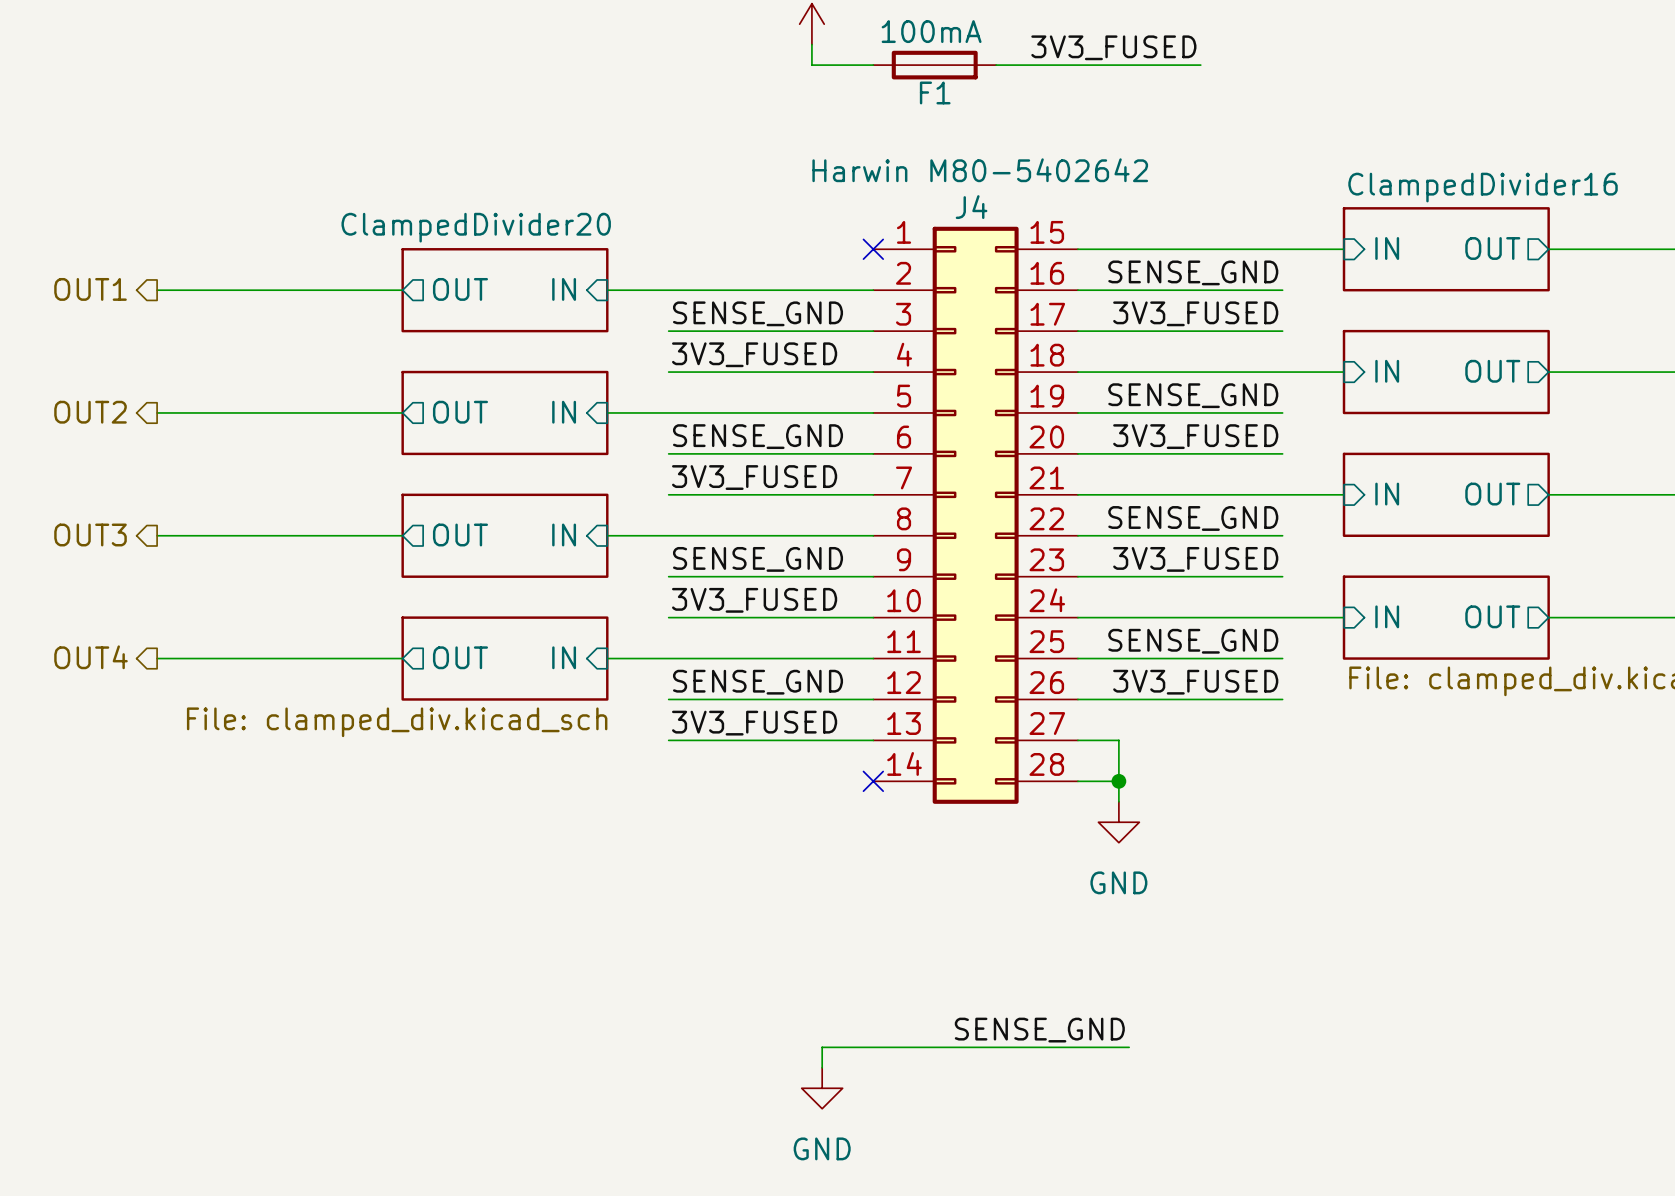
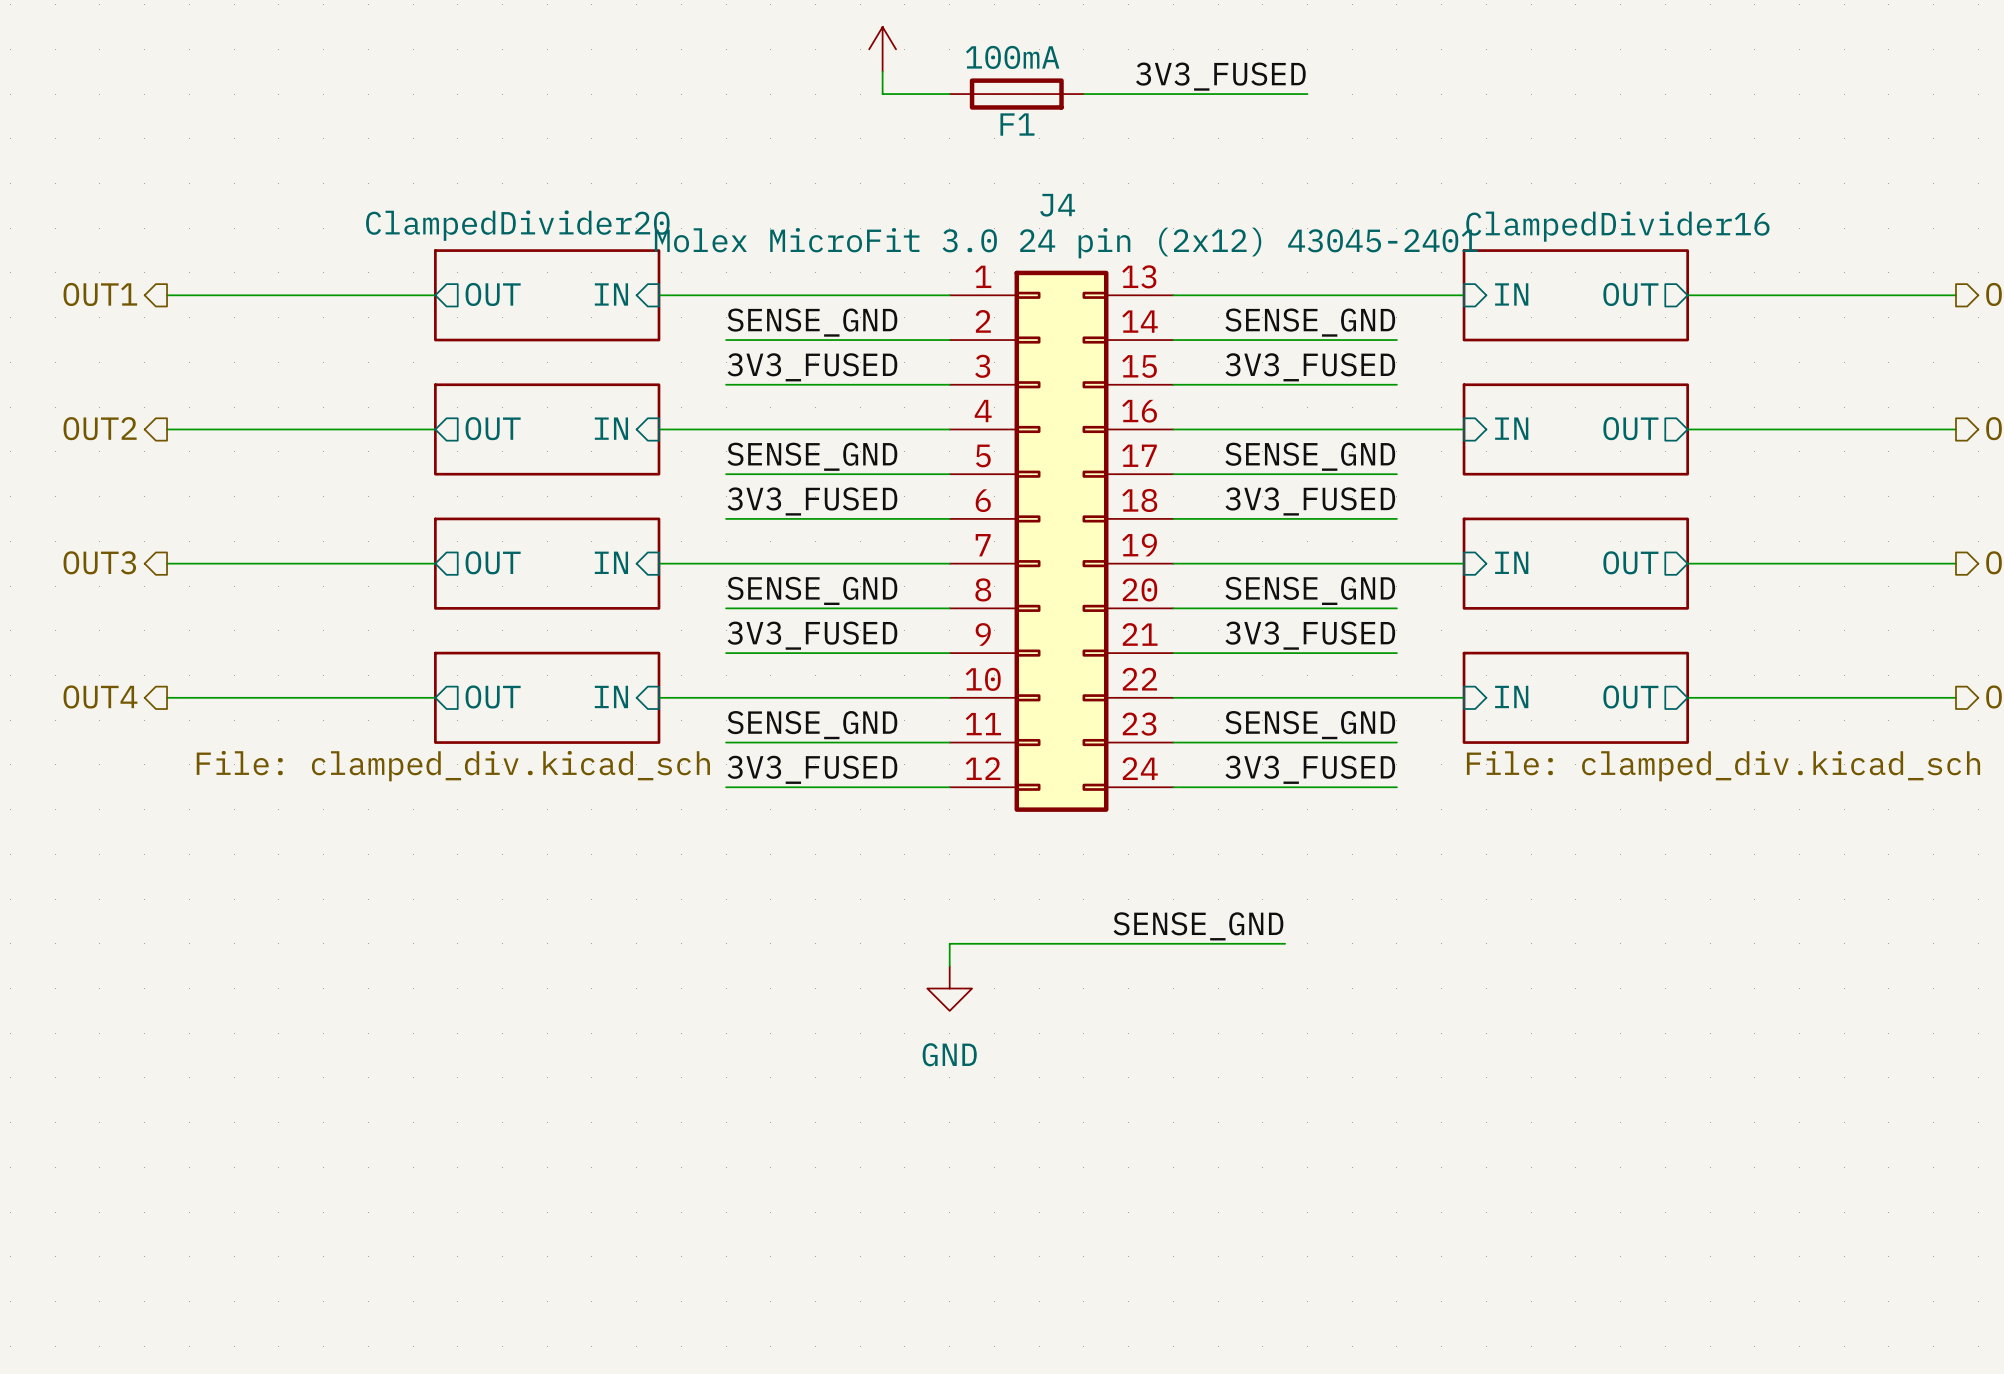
J4 value: Harwin M80-5402642 (980, 170) -> Molex MicroFit 3.0 24 pin (2x12) 43045-2401 (1066, 243)
J4 symbol: [873, 226, 1078, 804] -> [949, 270, 1174, 812]
wire: none -> (658, 295) (949, 295)
no-connect mark: (873, 249) -> none
label: none -> SENSE_GND (812, 322)
hierarchical label position: OUT1 (90, 289) -> OUT1 (100, 294)
sheet pin position: OUT (460, 289) -> OUT (493, 294)
sheet pin position: IN (564, 289) -> IN (611, 294)
wire: (157, 290) (402, 290) -> (167, 295) (435, 295)
sheet ClampedDivider20 position: (504, 290) -> (547, 295)
wire: (607, 290) (668, 290) -> none
label: SENSE_GND (758, 313) -> 3V3_FUSED (812, 367)
label: 3V3_FUSED (754, 354) -> none
sheet: none -> (547, 429)
label: none -> SENSE_GND (812, 456)
hierarchical label position: OUT2 (90, 412) -> OUT2 (100, 428)
wire: (157, 412) (402, 412) -> (167, 429) (435, 429)
sheet pin position: OUT (460, 412) -> OUT (493, 428)
sheet: (504, 412) -> none
sheet pin position: IN (564, 412) -> IN (611, 428)
wire: (607, 412) (668, 412) -> (658, 429) (726, 429)
label: SENSE_GND (758, 436) -> 3V3_FUSED (812, 501)
label: 3V3_FUSED (754, 477) -> none
sheet: none -> (547, 563)
label: none -> SENSE_GND (812, 590)
hierarchical label position: OUT3 (90, 534) -> OUT3 (99, 562)
sheet pin position: OUT (460, 534) -> OUT (493, 562)
sheet pin position: IN (564, 534) -> IN (611, 562)
wire: (157, 535) (402, 535) -> (167, 563) (435, 563)
sheet: (504, 535) -> none
wire: (607, 535) (668, 535) -> (658, 563) (726, 563)
label: SENSE_GND (758, 559) -> 3V3_FUSED (812, 635)
label: 3V3_FUSED (754, 600) -> none
label: none -> SENSE_GND (812, 725)
hierarchical label position: OUT4 (91, 657) -> OUT4 (100, 696)
sheet pin position: OUT (460, 657) -> OUT (493, 696)
sheet pin position: IN (564, 657) -> IN (611, 696)
wire: (157, 658) (402, 658) -> (167, 697) (435, 697)
sheet position: (504, 658) -> (547, 697)
wire: (607, 658) (668, 658) -> (658, 697) (726, 697)
label: SENSE_GND (758, 682) -> 3V3_FUSED (812, 769)
label: 3V3_FUSED (754, 723) -> none
wire: (668, 740) (873, 740) -> none
wire: (1077, 740) (1118, 740) (1118, 801) -> none
no-connect mark: (873, 781) -> none
wire: (1077, 781) (1118, 781) -> none
junction: (1118, 781) -> none
power symbol: GND (1118, 822) -> none
power symbol: none -> GND (949, 988)
label position: SENSE_GND (1039, 1030) -> SENSE_GND (1198, 926)
wire: (1129, 1047) (822, 1047) (822, 1067) -> (1285, 943) (949, 943) (949, 966)
power symbol: GND (822, 1088) -> none

